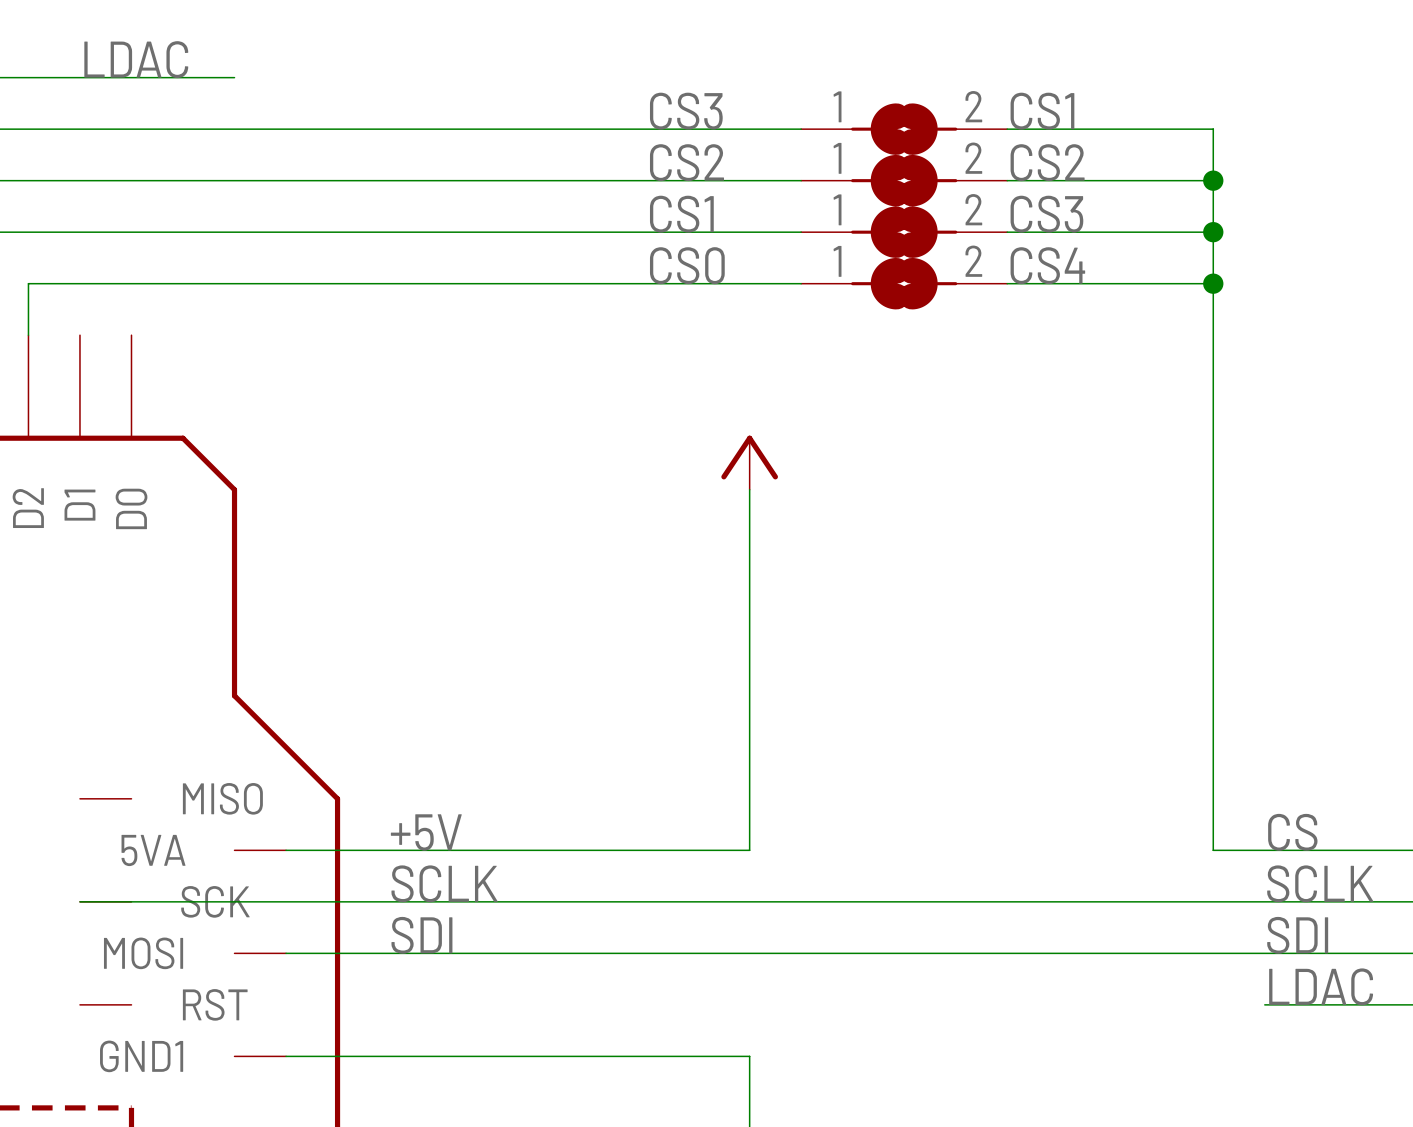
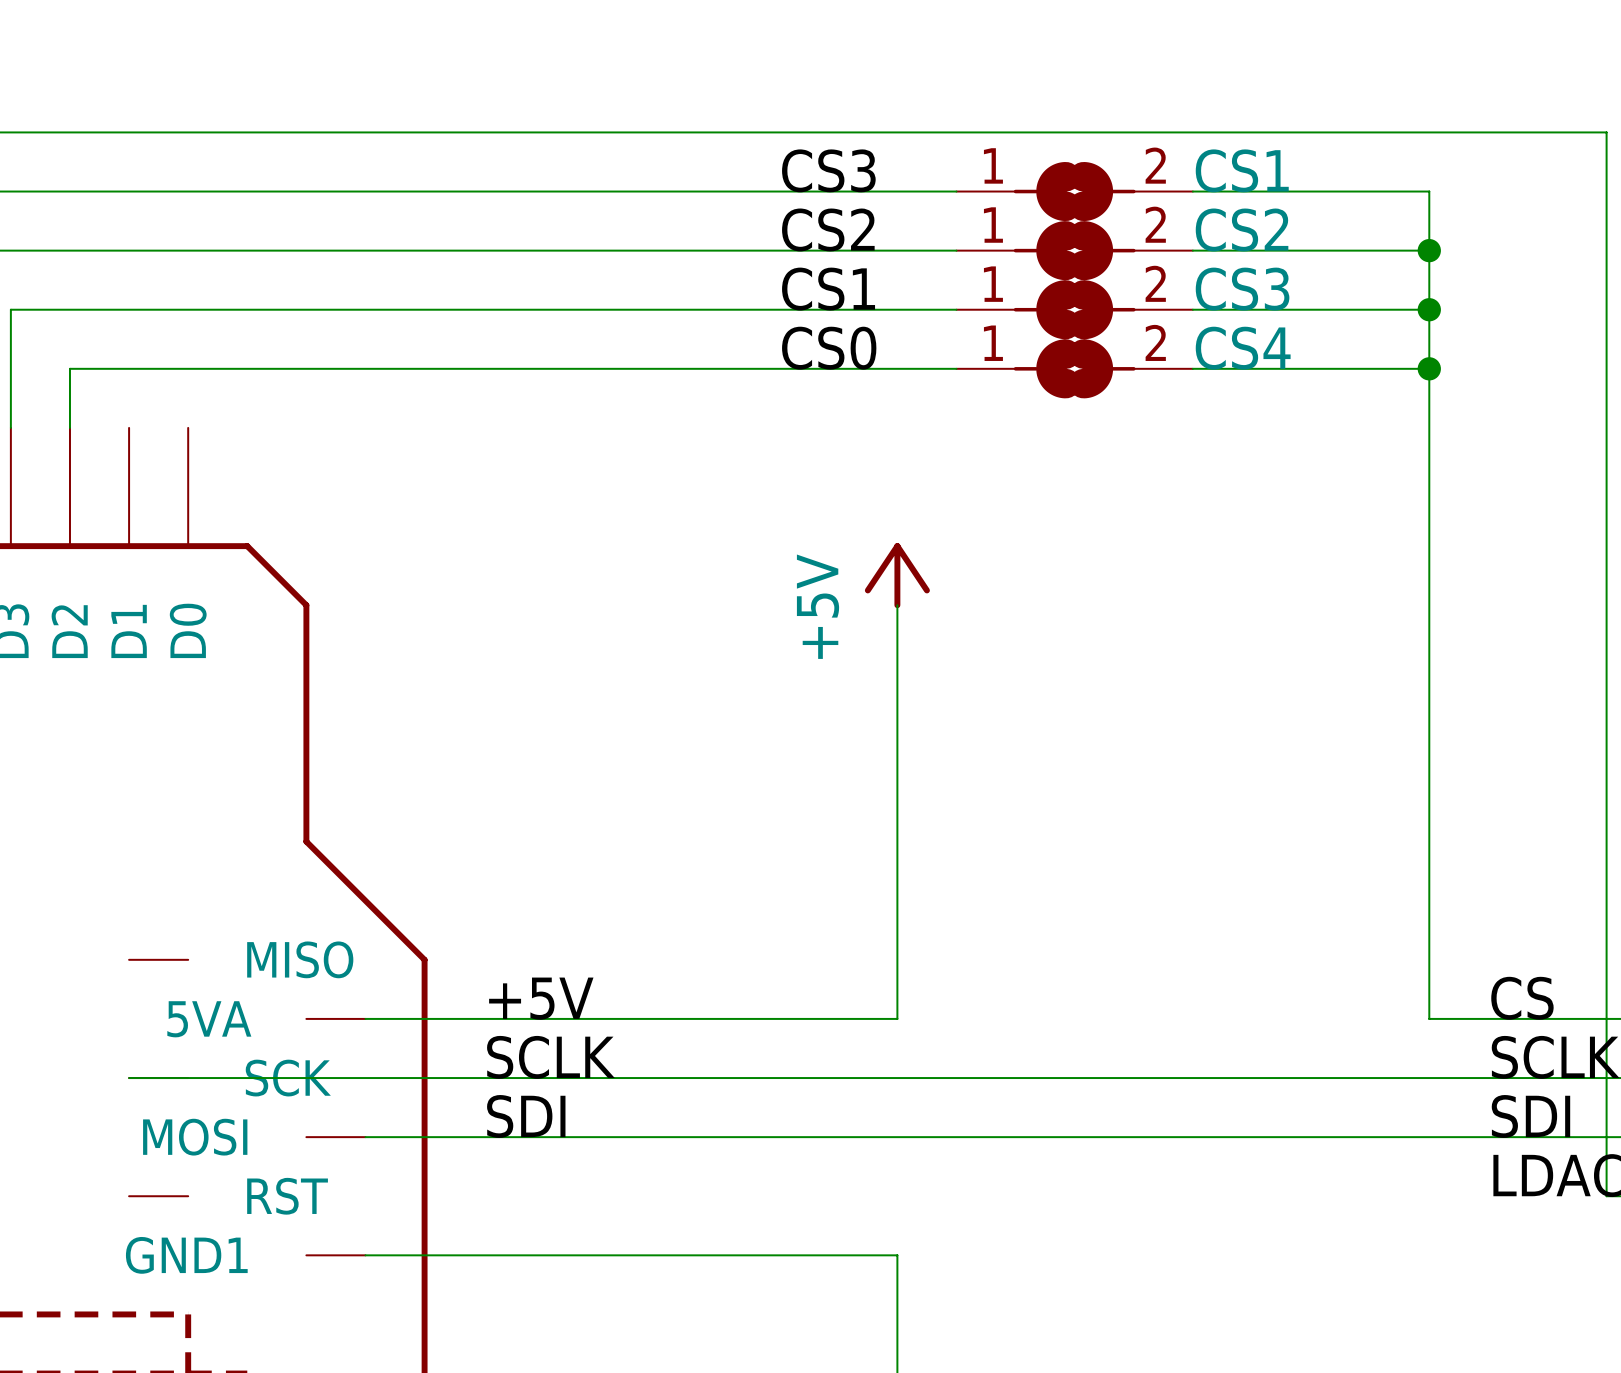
label: LDAC (136, 59) -> none
power symbol: (749, 462) -> none
part: none -> +5V (897, 575)
wire: (1264, 1004) (1367, 1004) -> (306, 132) (1606, 132) (1606, 1196)

